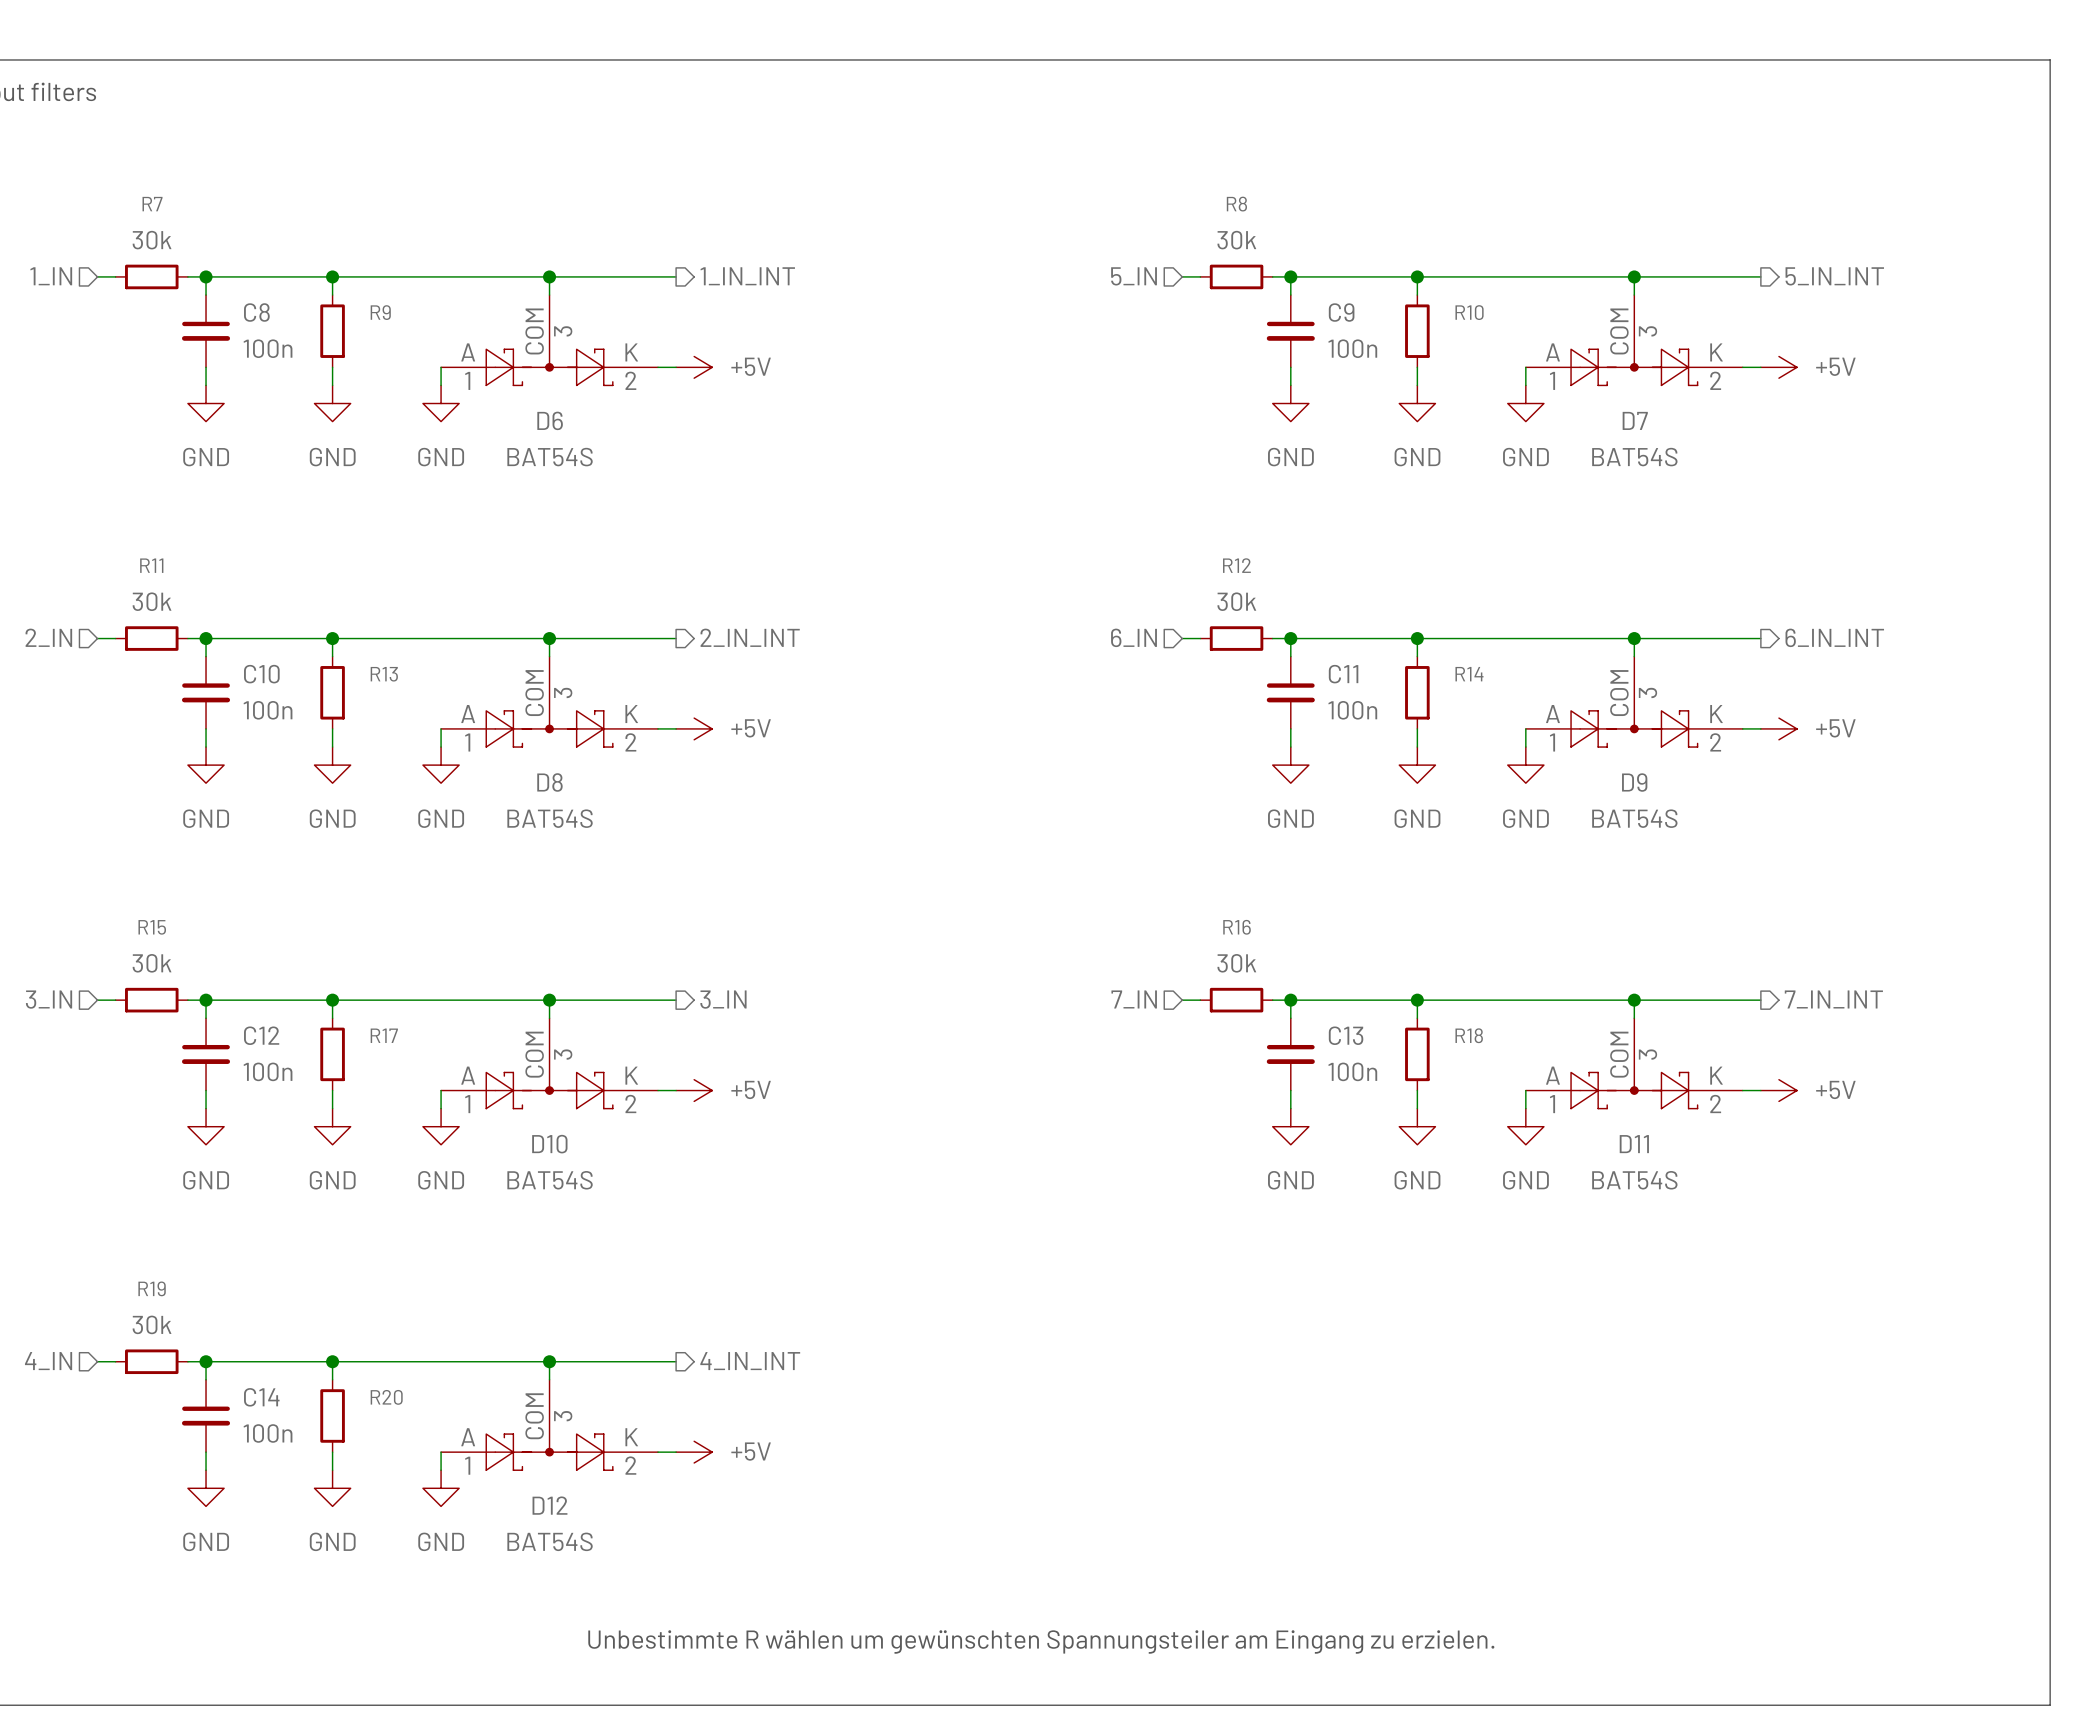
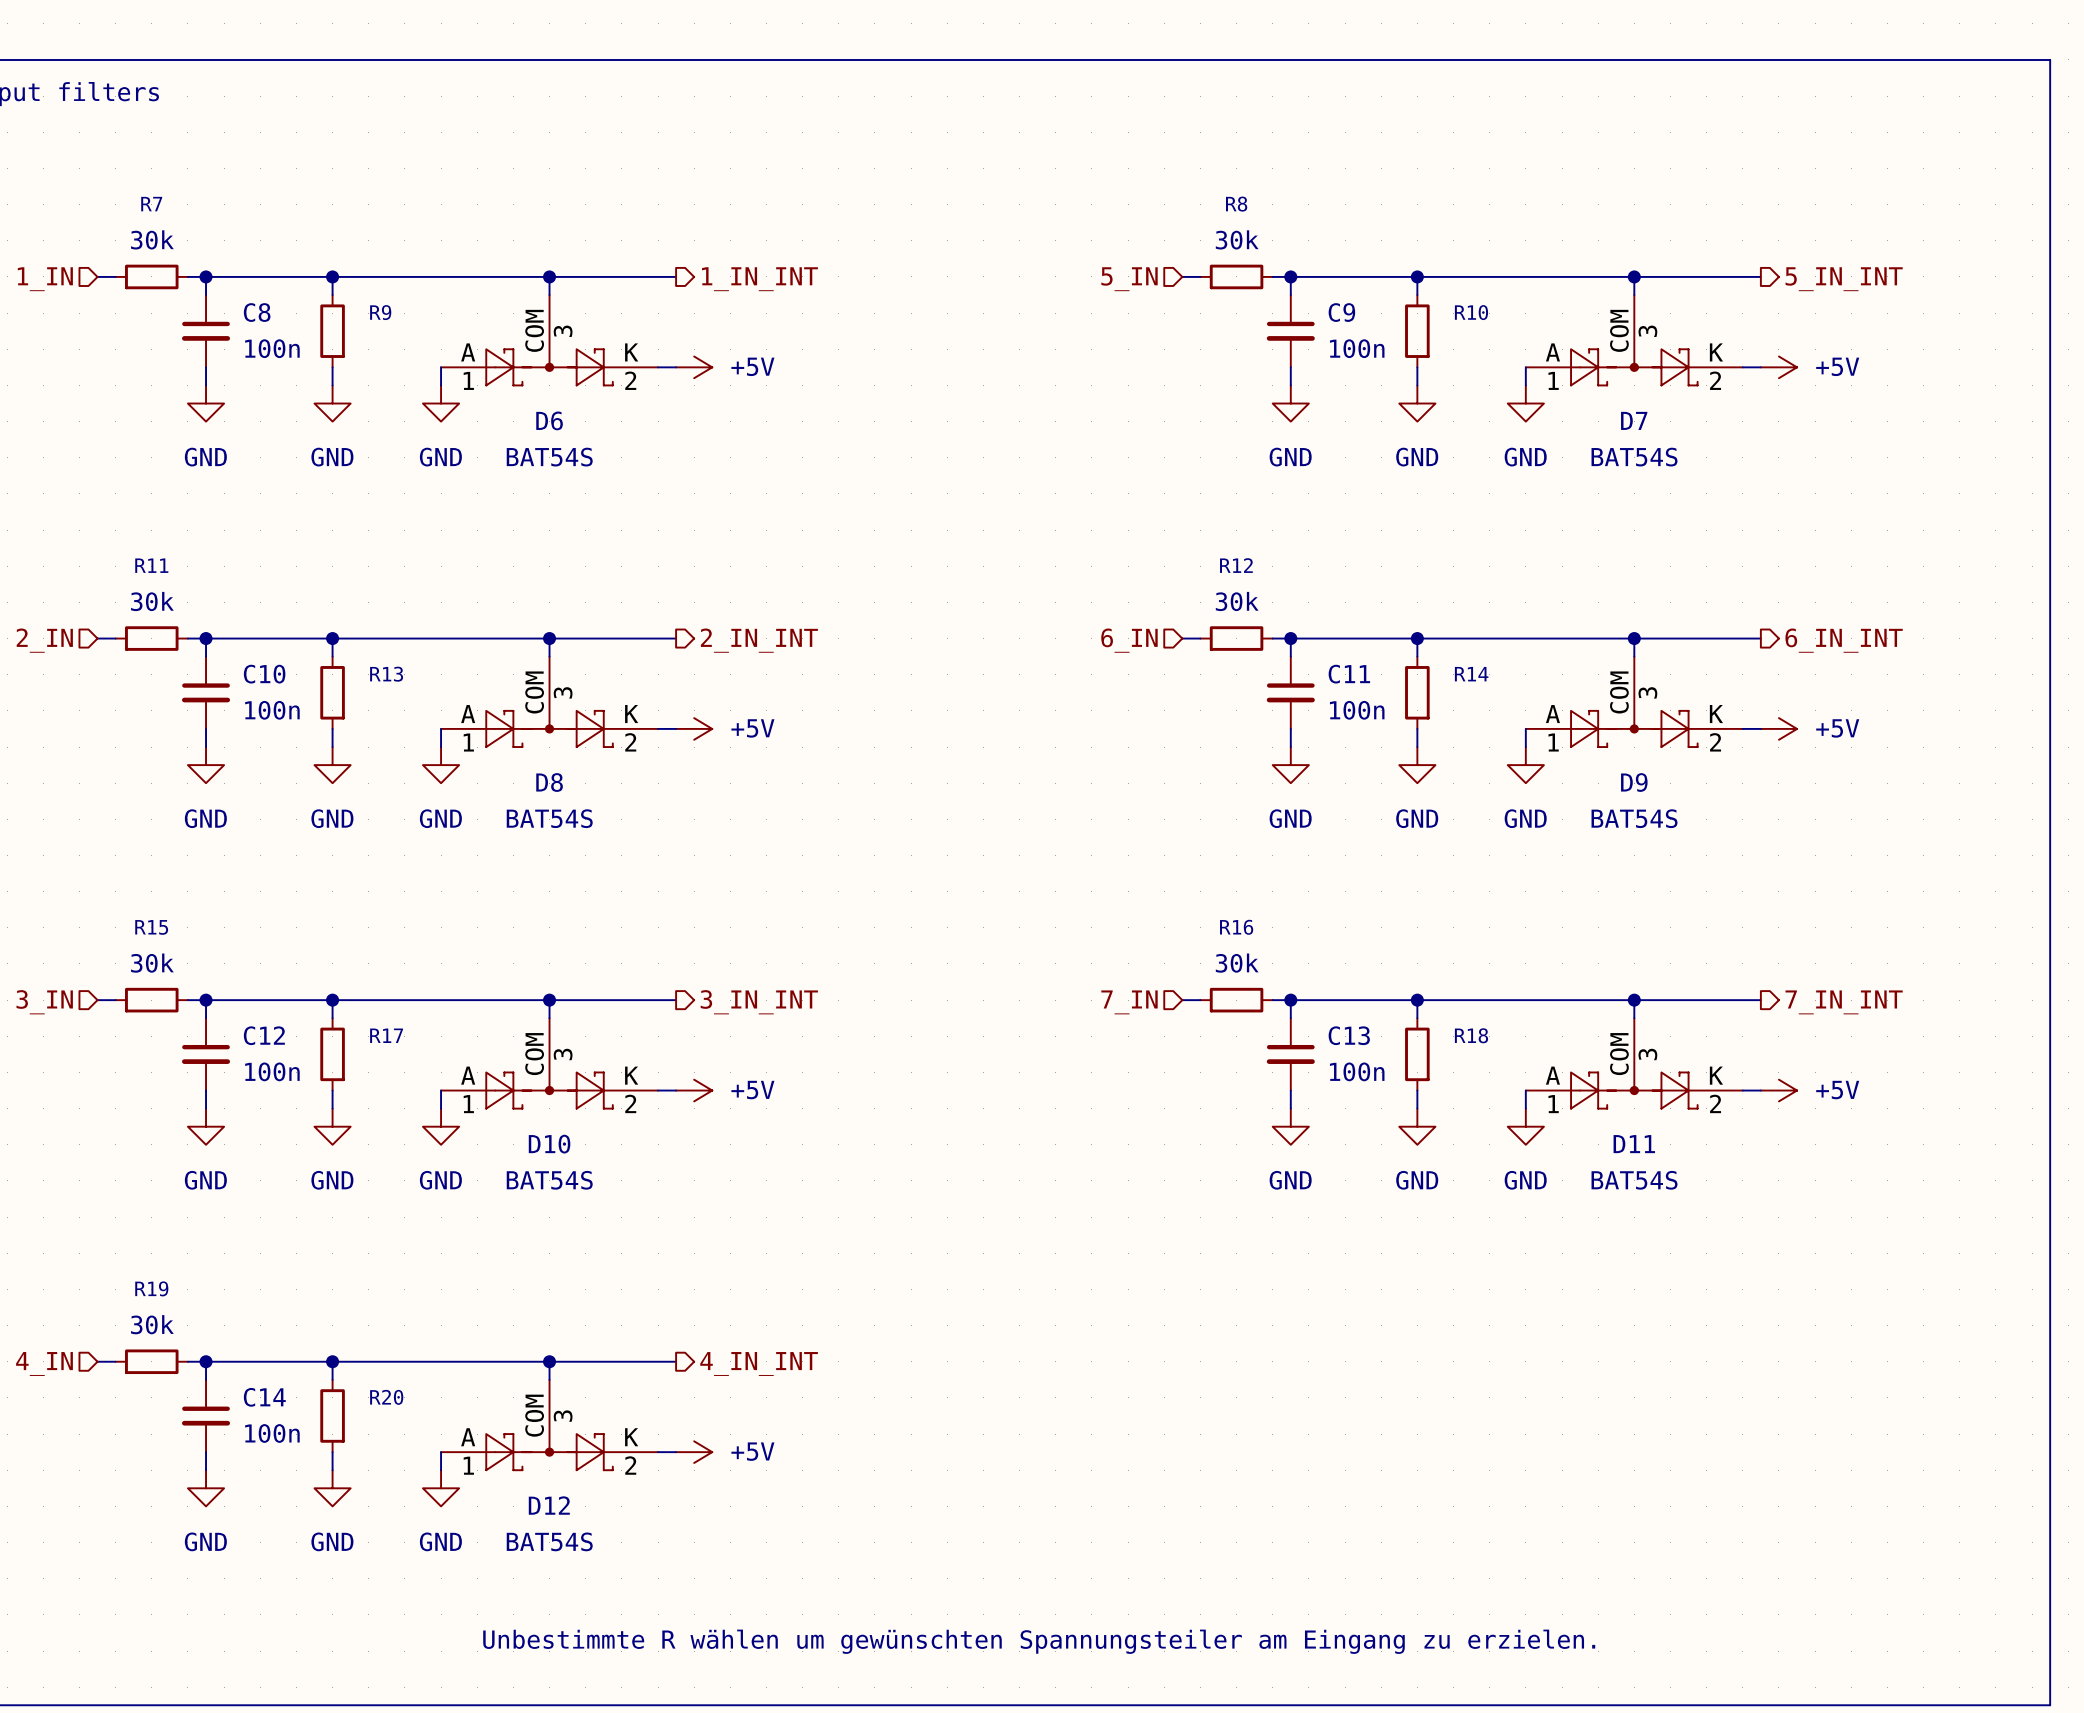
hierarchical label: 3_IN (723, 999) -> 3_IN_INT (759, 1002)

